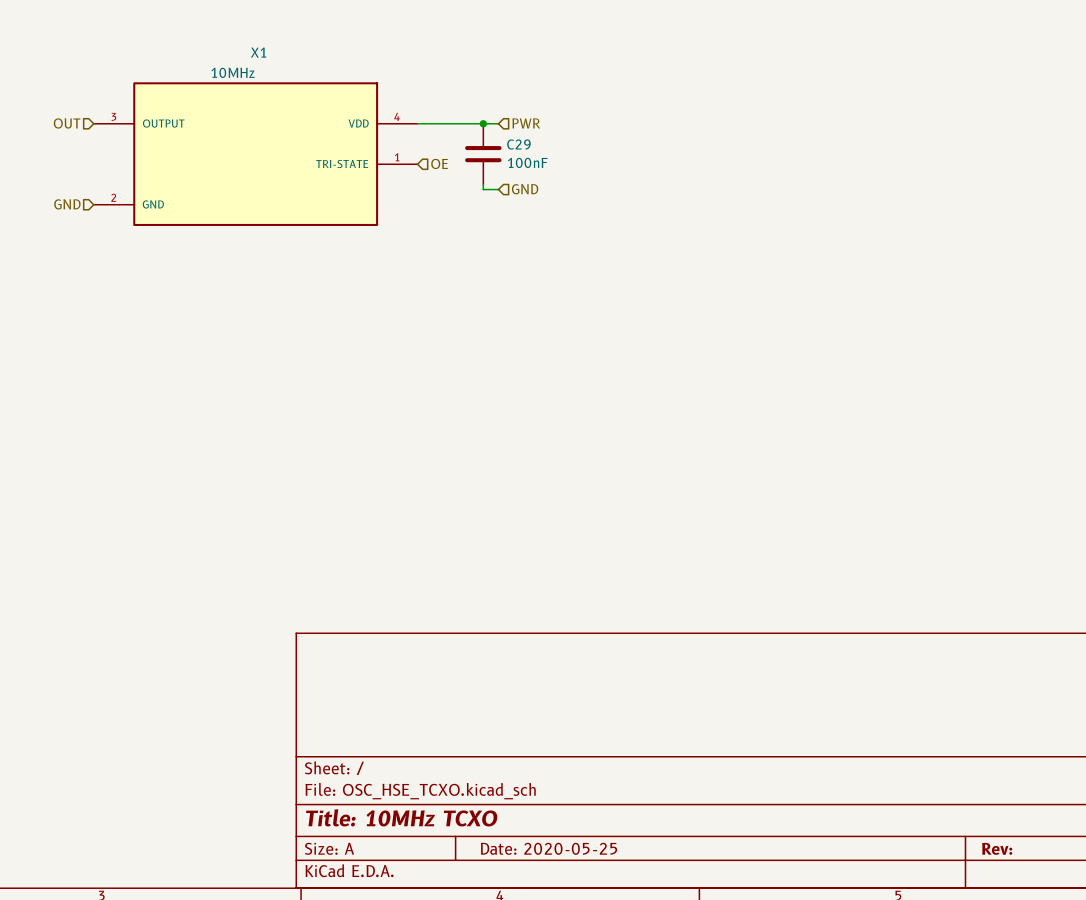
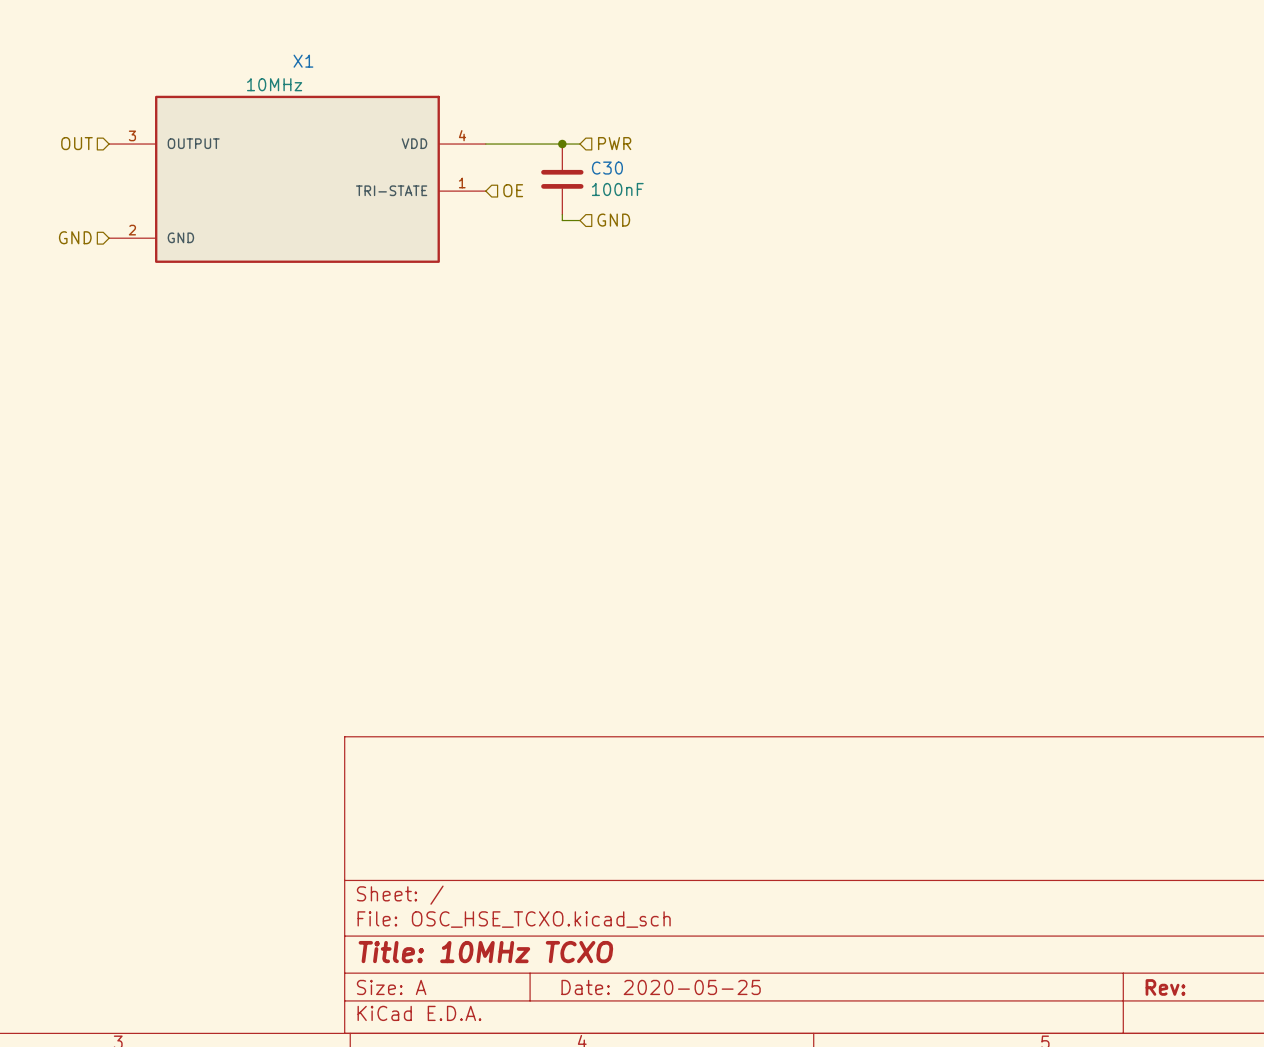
C29 name: C29 (518, 144) -> C30 (607, 168)

